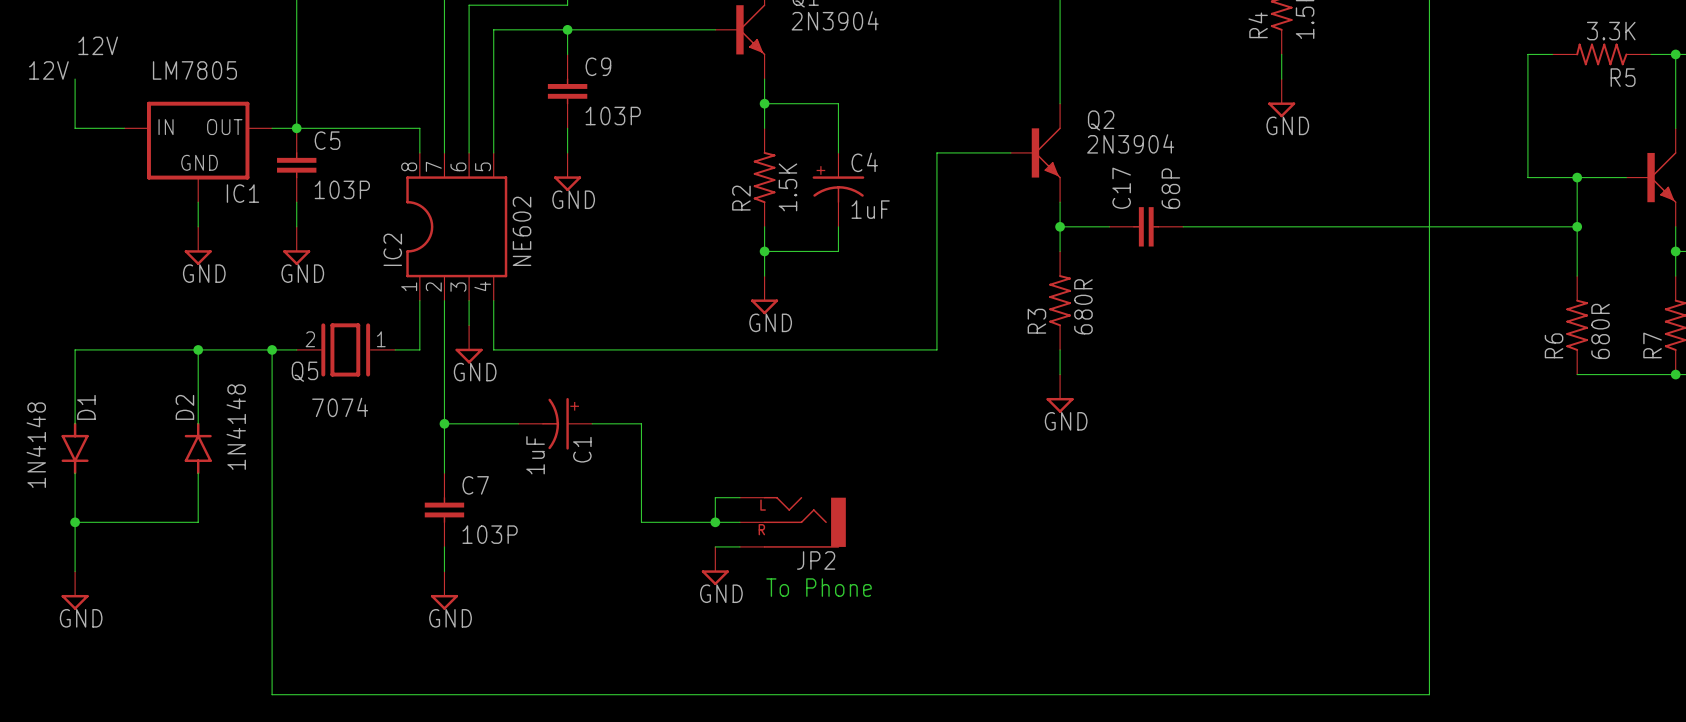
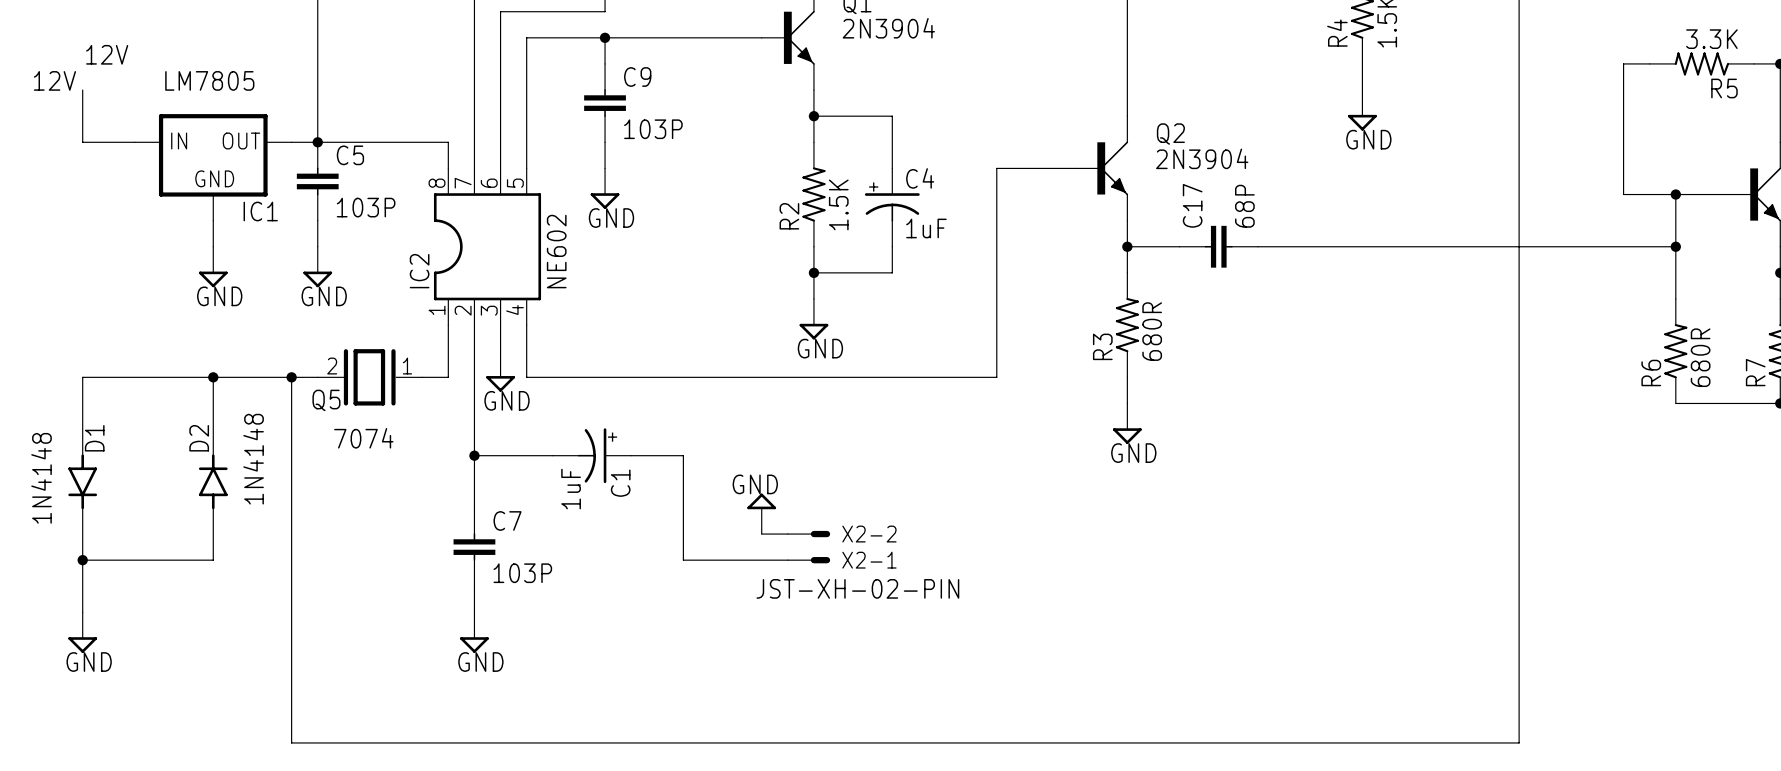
wire: (715, 497) (715, 522) -> none
X2-2: none -> (809, 534)
junction: (715, 522) -> none
X2-1: none -> JST-XH-02-PIN (809, 560)
JP2: (792, 522) -> none
wire: (715, 546) (739, 546) -> none
power symbol position: GND (715, 566) -> GND (761, 513)
power symbol rotation: 0° (715, 577) -> 180° (761, 501)
text: To Phone (819, 587) -> none

